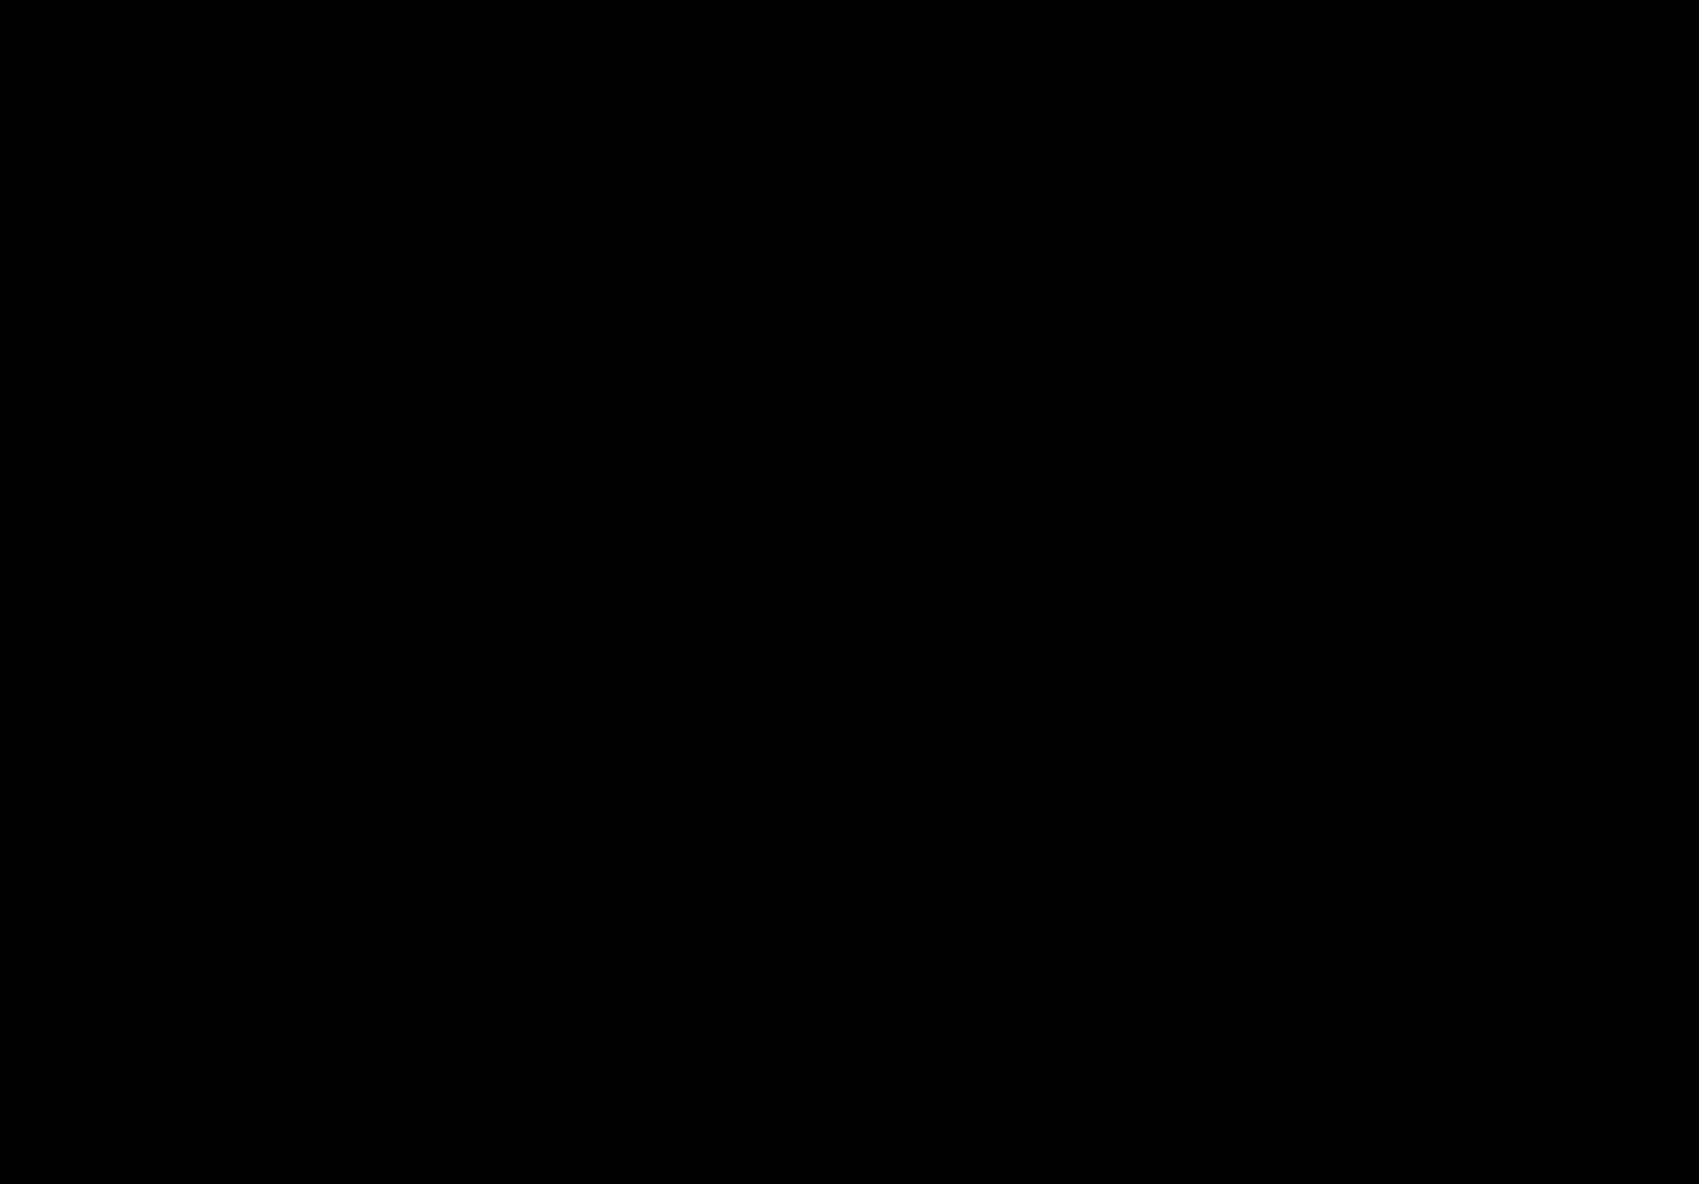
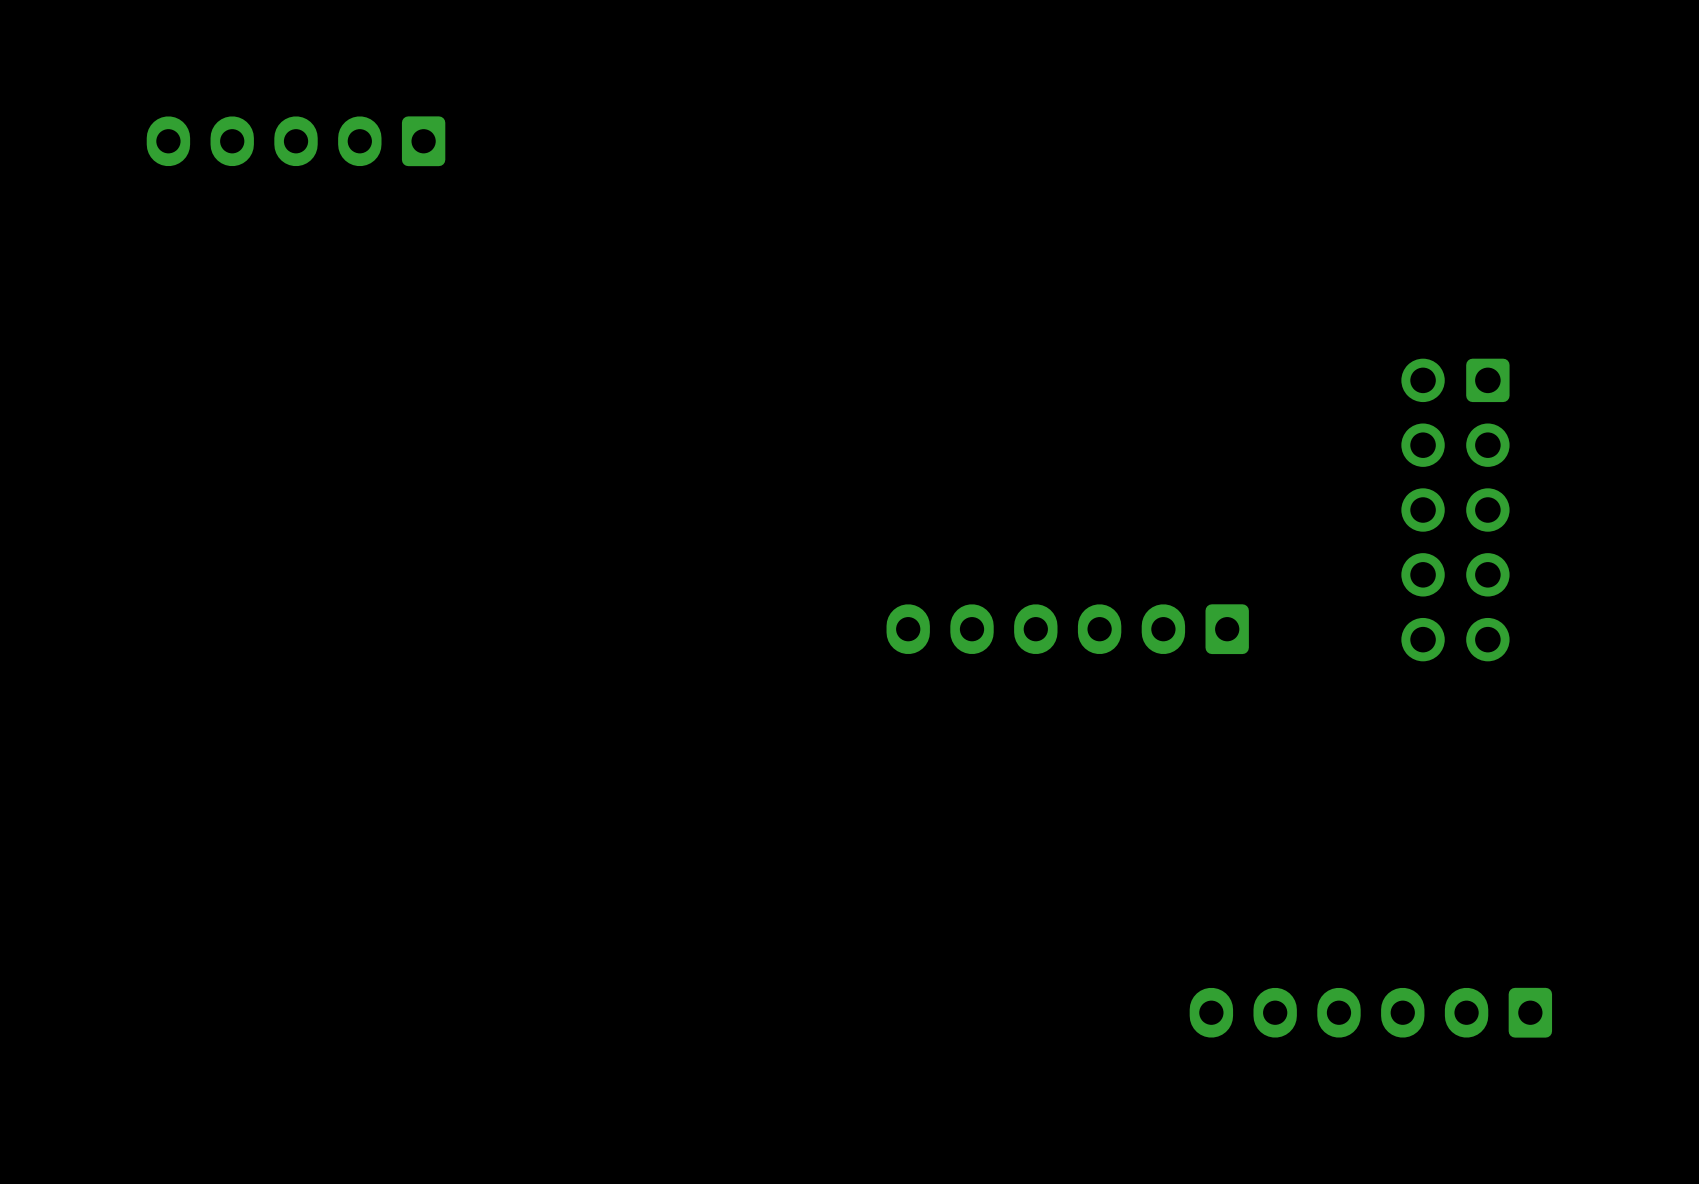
part: none -> (296, 141)
part: none -> (1455, 510)
part: none -> (1067, 629)
part: none -> (1370, 1012)

